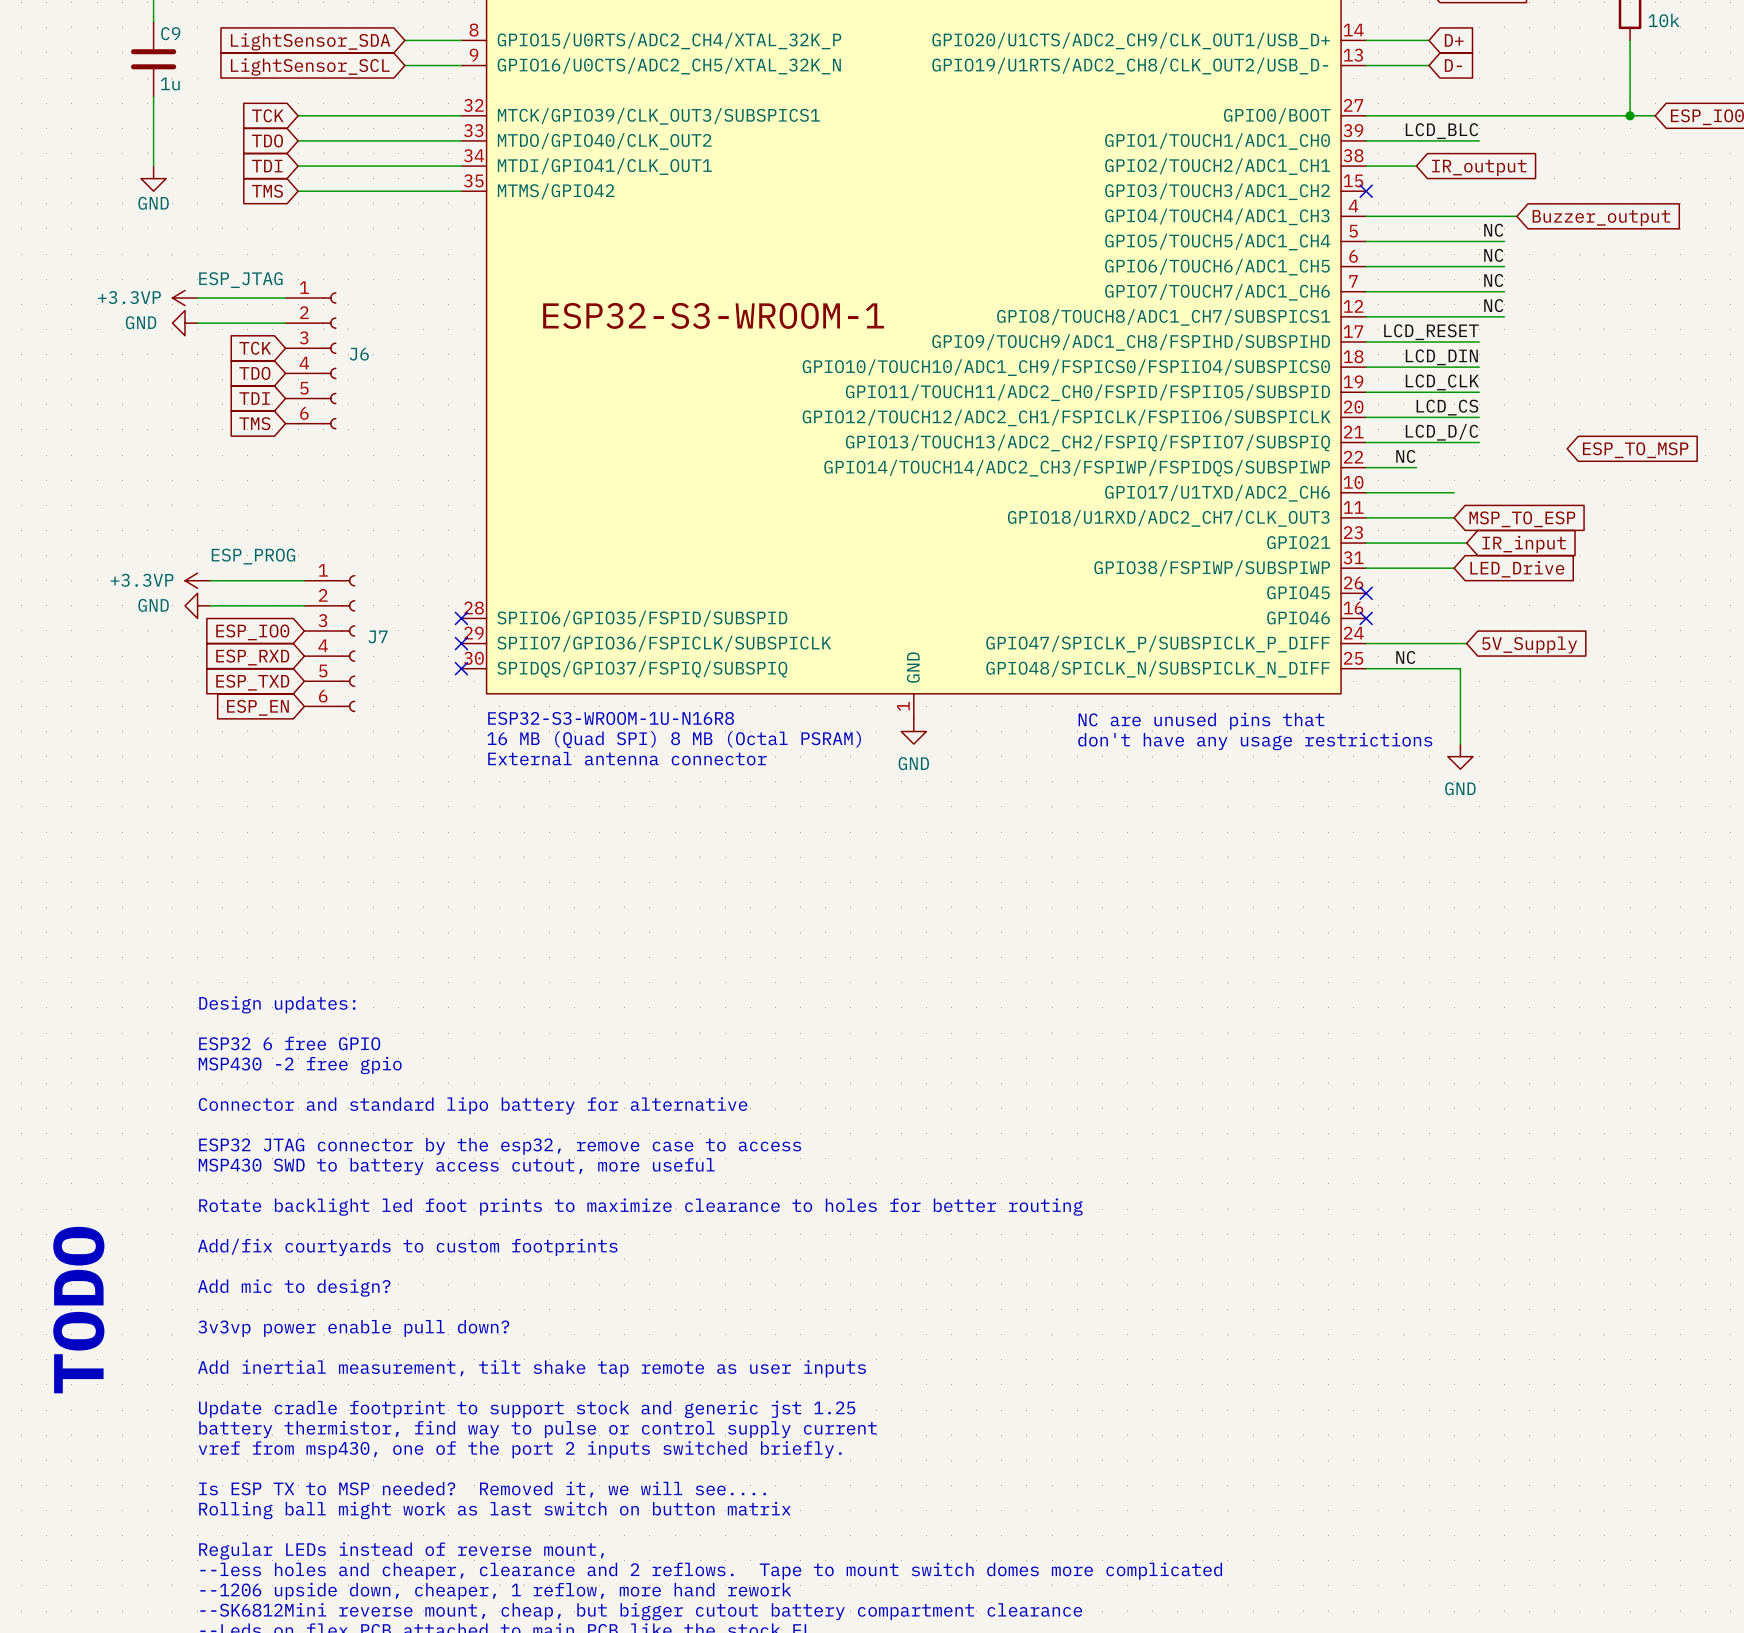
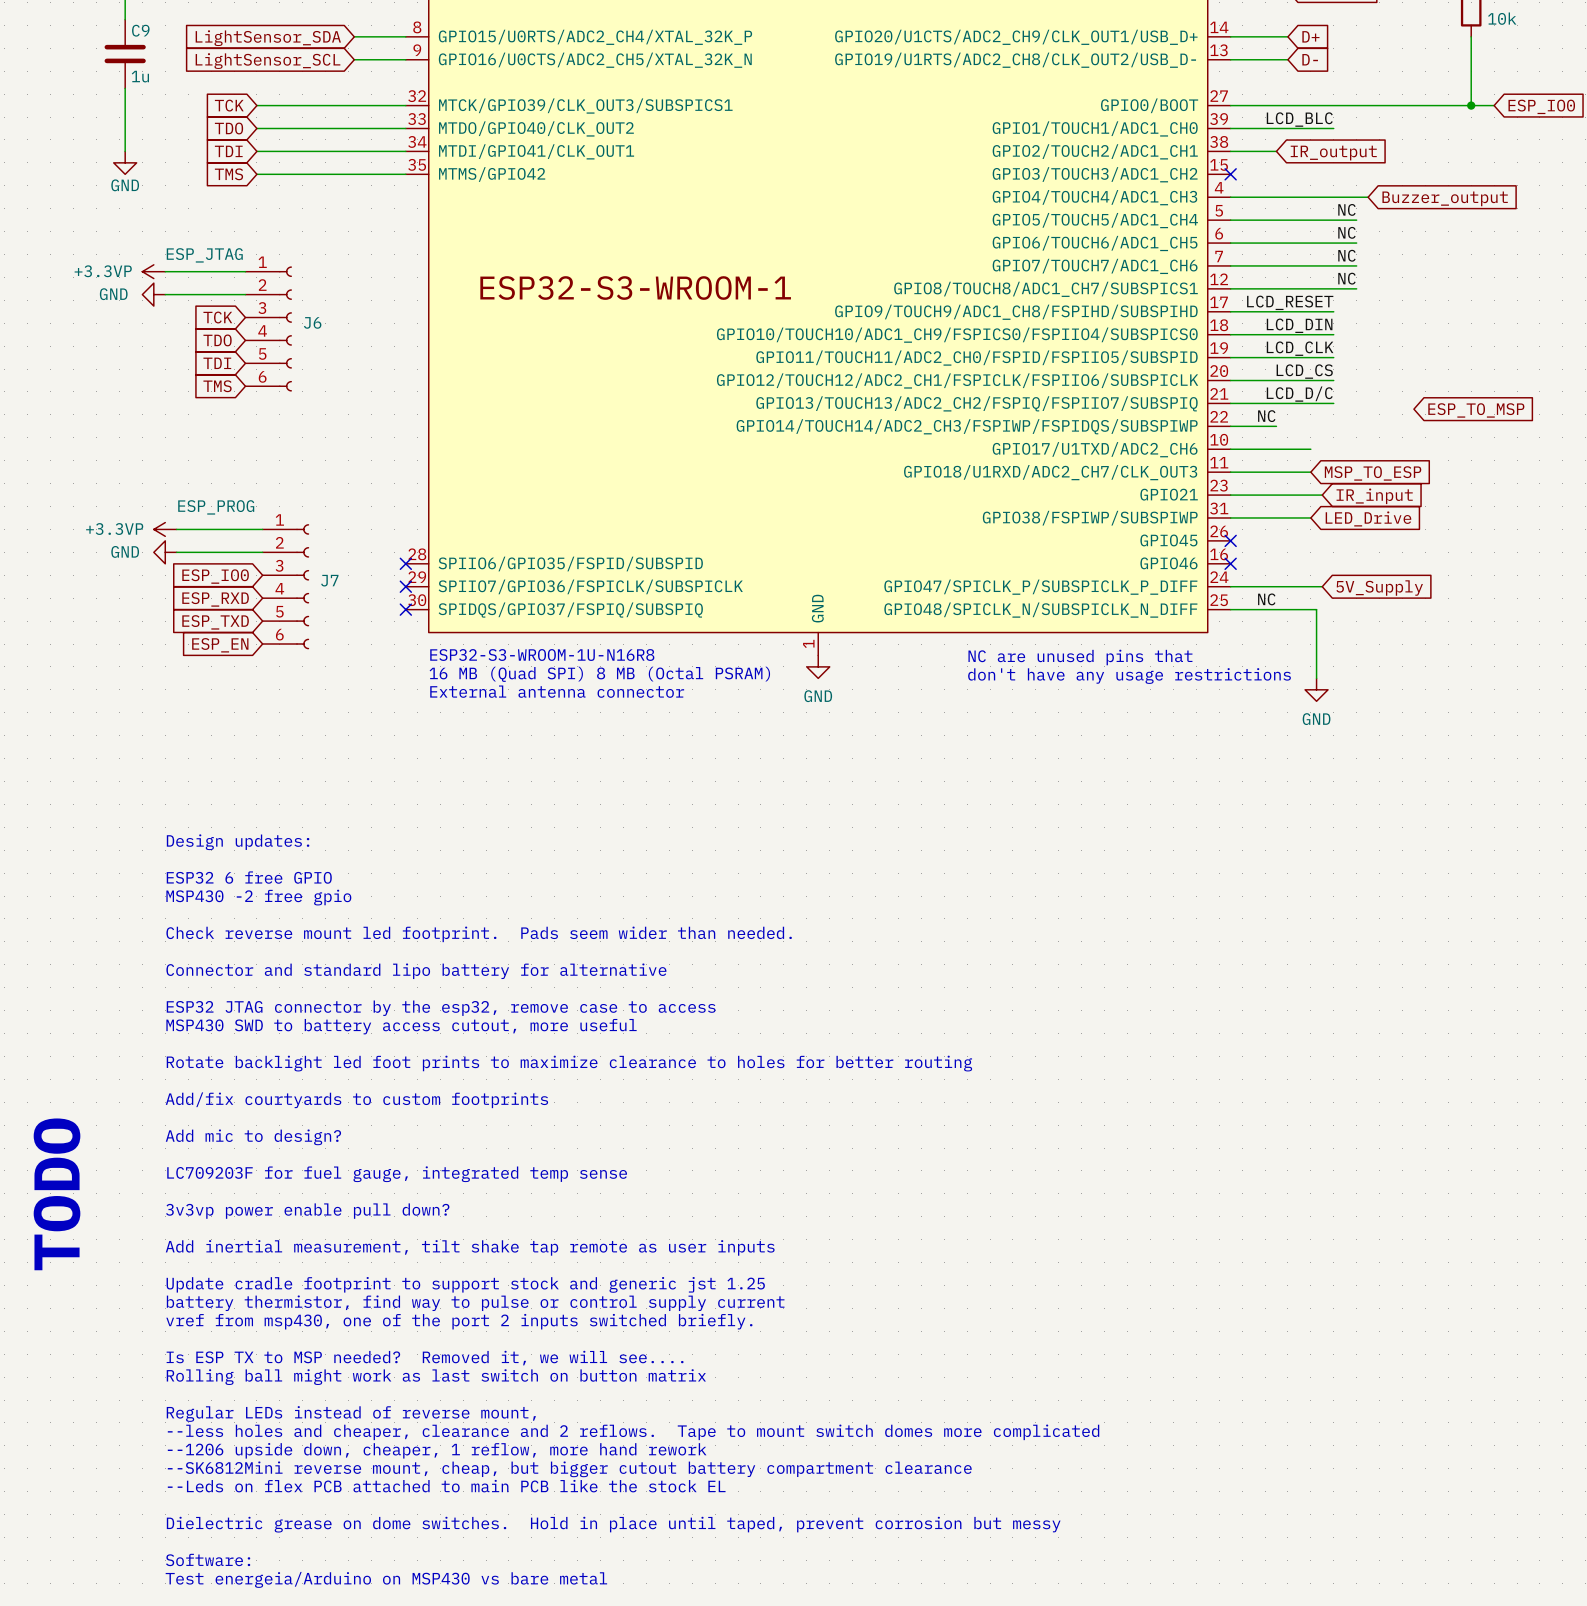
text: none -> MSP430 -2 free gpio (258, 897)
text position: Design updates: (277, 1004) -> Design updates: (238, 842)
text: none -> Check reverse mount led footprint. Pads seem wider than needed. (479, 934)
text position: ESP32 6 free GPIO (289, 1043) -> ESP32 6 free GPIO (249, 877)
text: MSP430 -2 free gpio (300, 1065) -> Connector and standard lipo battery for alternative (416, 971)
text: Connector and standard lipo battery for alternative (473, 1105) -> ESP32 JTAG connector by the esp32, remove case to access (441, 1008)
text: none -> MSP430 SWD to battery access cutout, more useful (401, 1026)
text: ESP32 JTAG connector by the esp32, remove case to access (500, 1146) -> none
text: MSP430 SWD to battery access cutout, more useful (456, 1166) -> Rotate backlight led foot prints to maximize clearance to holes for better routing (569, 1063)
text: Rotate backlight led foot prints to maximize clearance to holes for better routing (640, 1207) -> Add/fix courtyards to custom footprints (356, 1100)
text: Add/fix courtyards to custom footprints (407, 1247) -> Add mic to design? (253, 1137)
text: Add mic to design? (294, 1288) -> LC709203F for fuel gauge, integrated temp sense (397, 1174)

